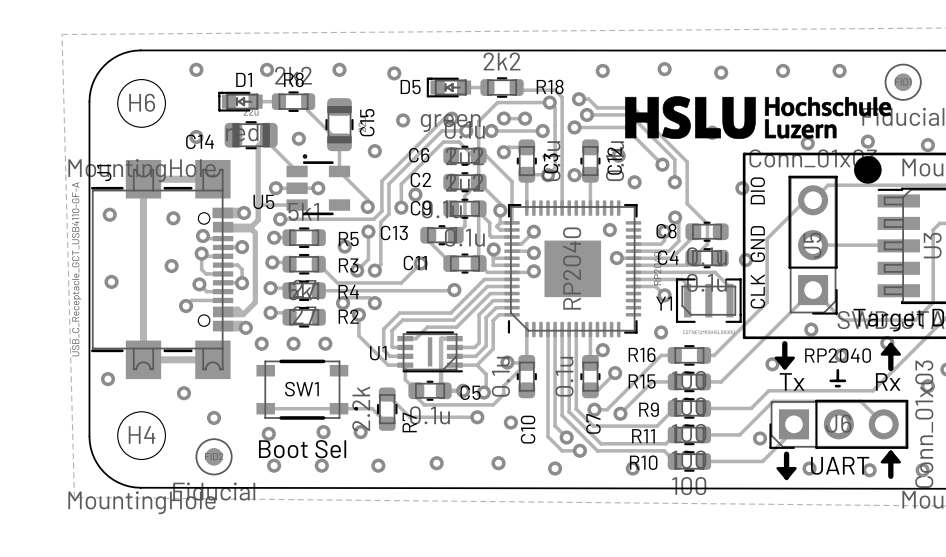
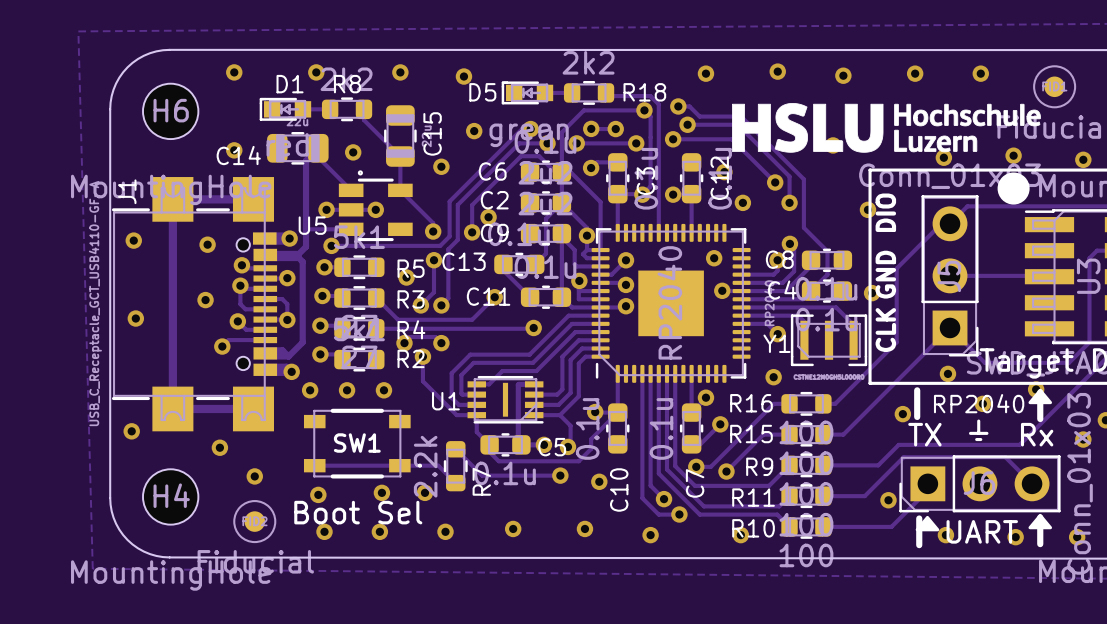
drawing: [774, 356, 795, 370] -> none
text: Tx (792, 381) -> TX (924, 434)
drawing: none -> [915, 515, 940, 532]
drawing: [776, 467, 797, 481] -> none

